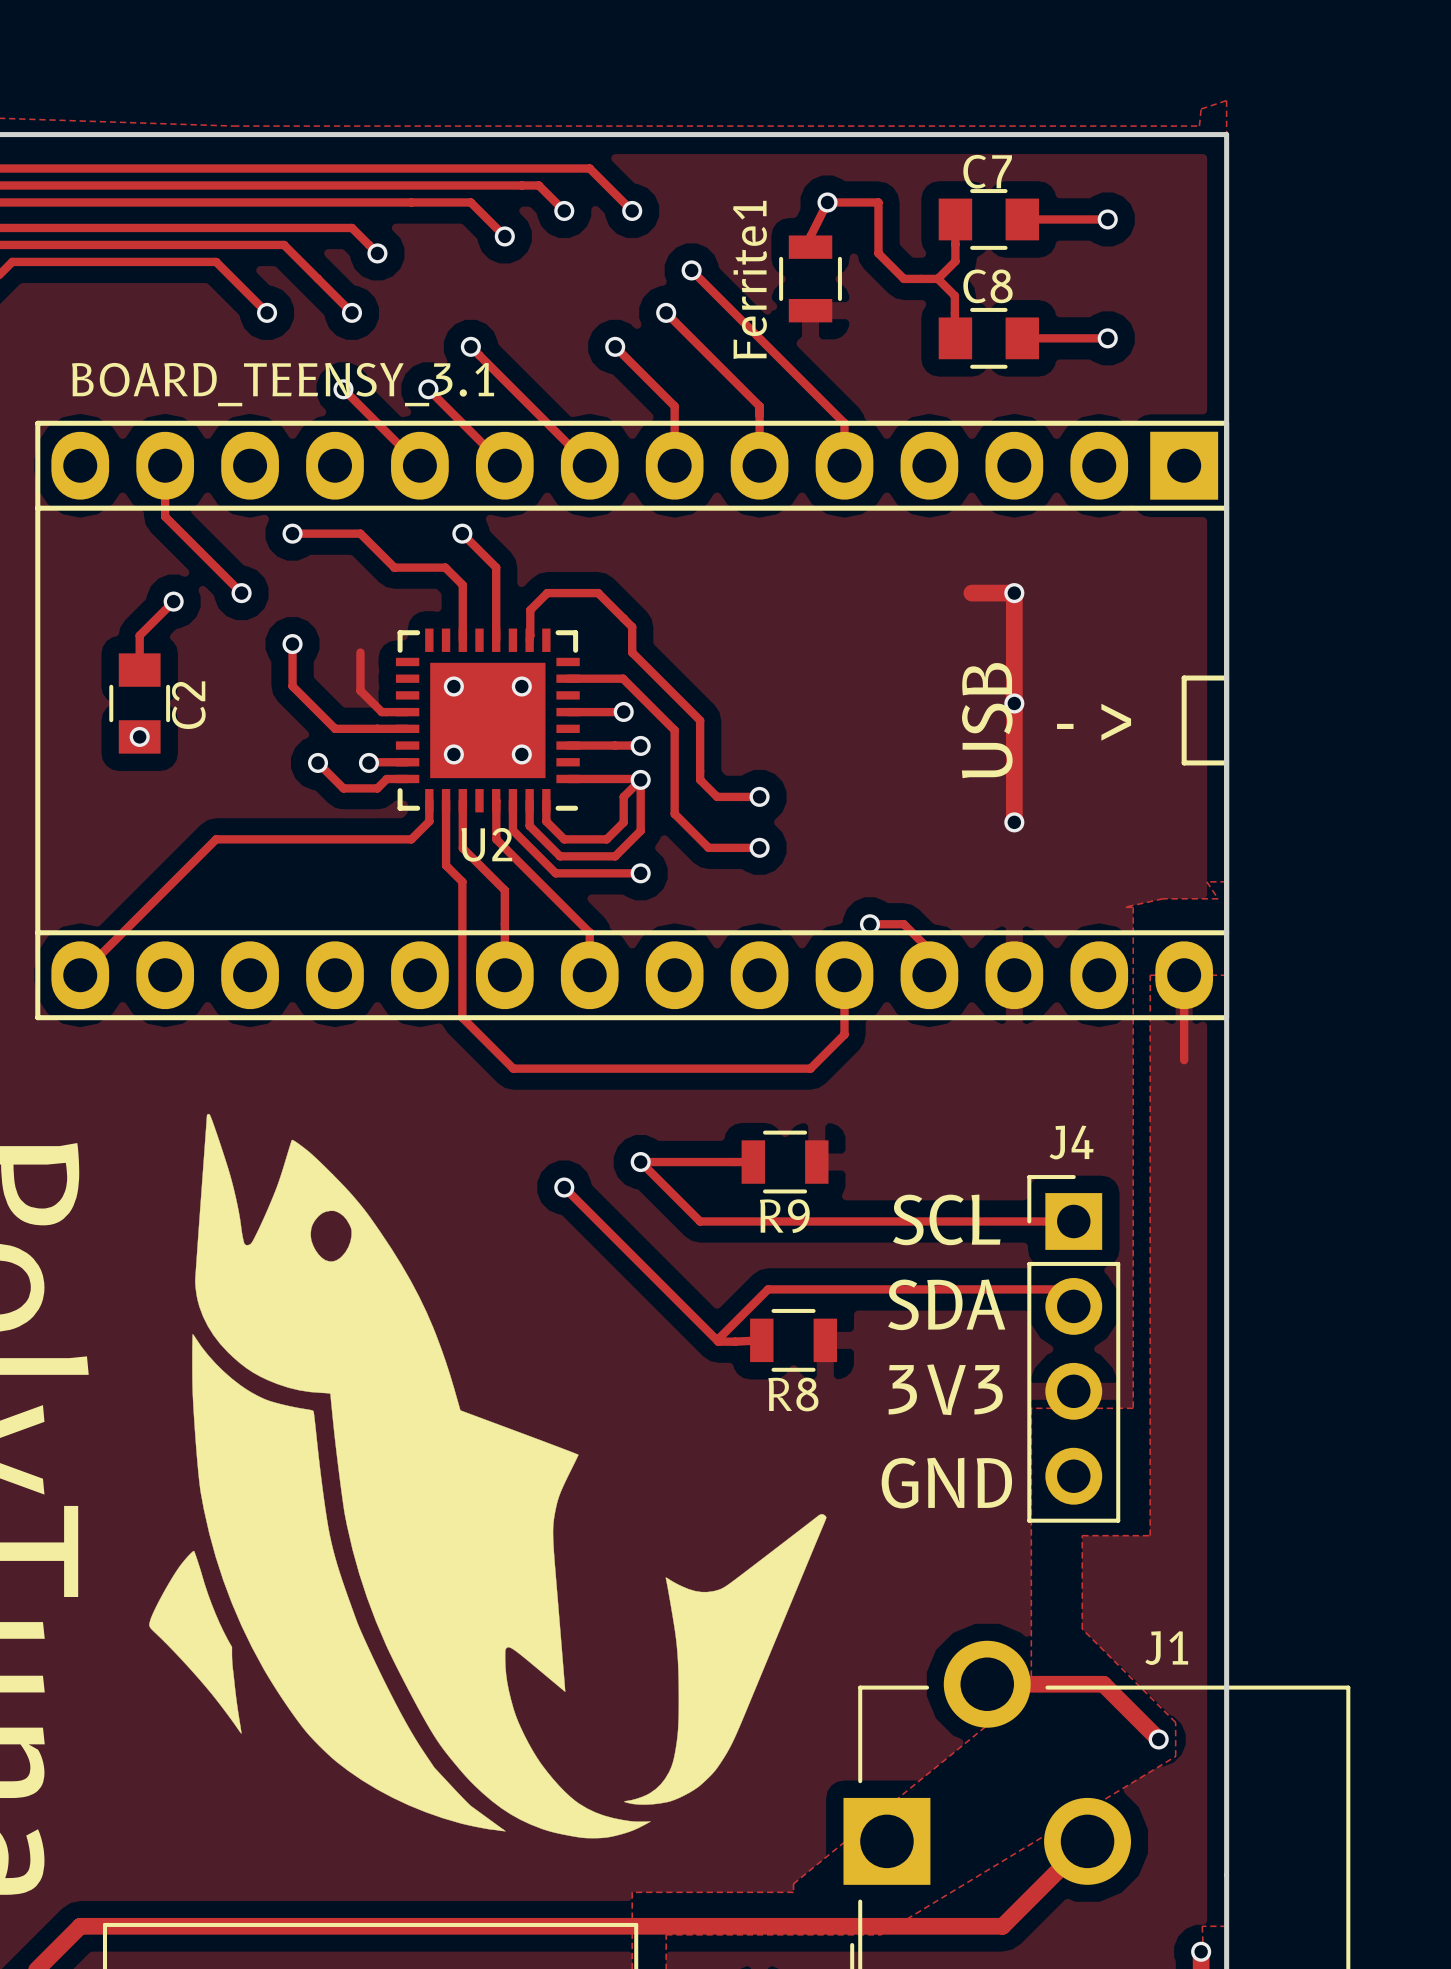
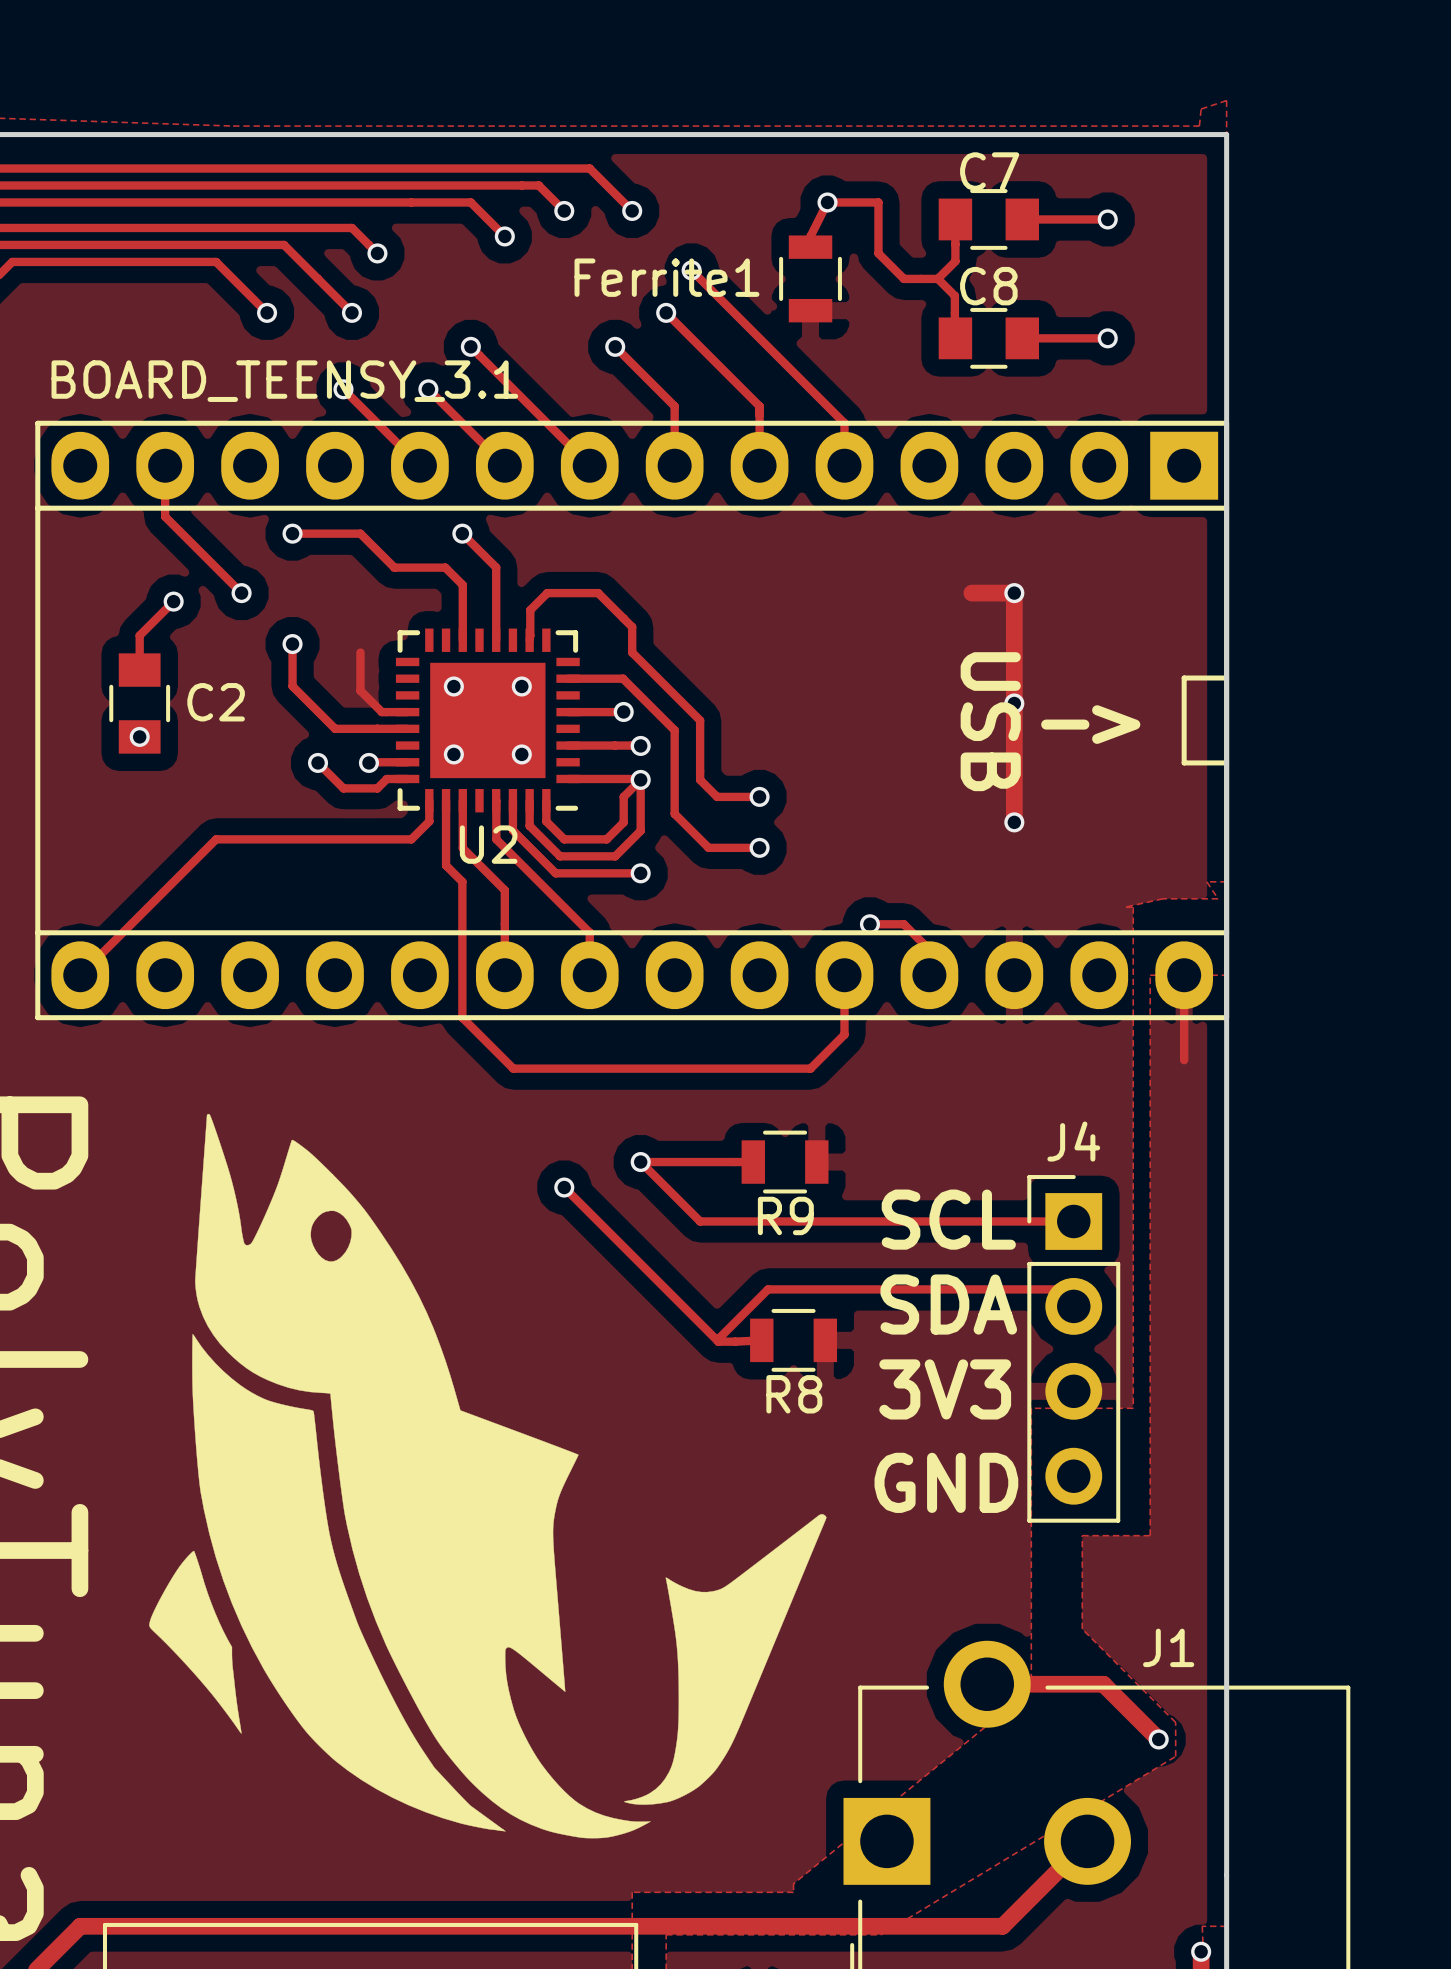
Ferrite1 name rotation: 0° (750, 279) -> 90° clockwise (666, 277)
C2 name rotation: 0° (188, 705) -> 90° clockwise (216, 702)
text rotation: 0° (987, 720) -> 180° (990, 721)

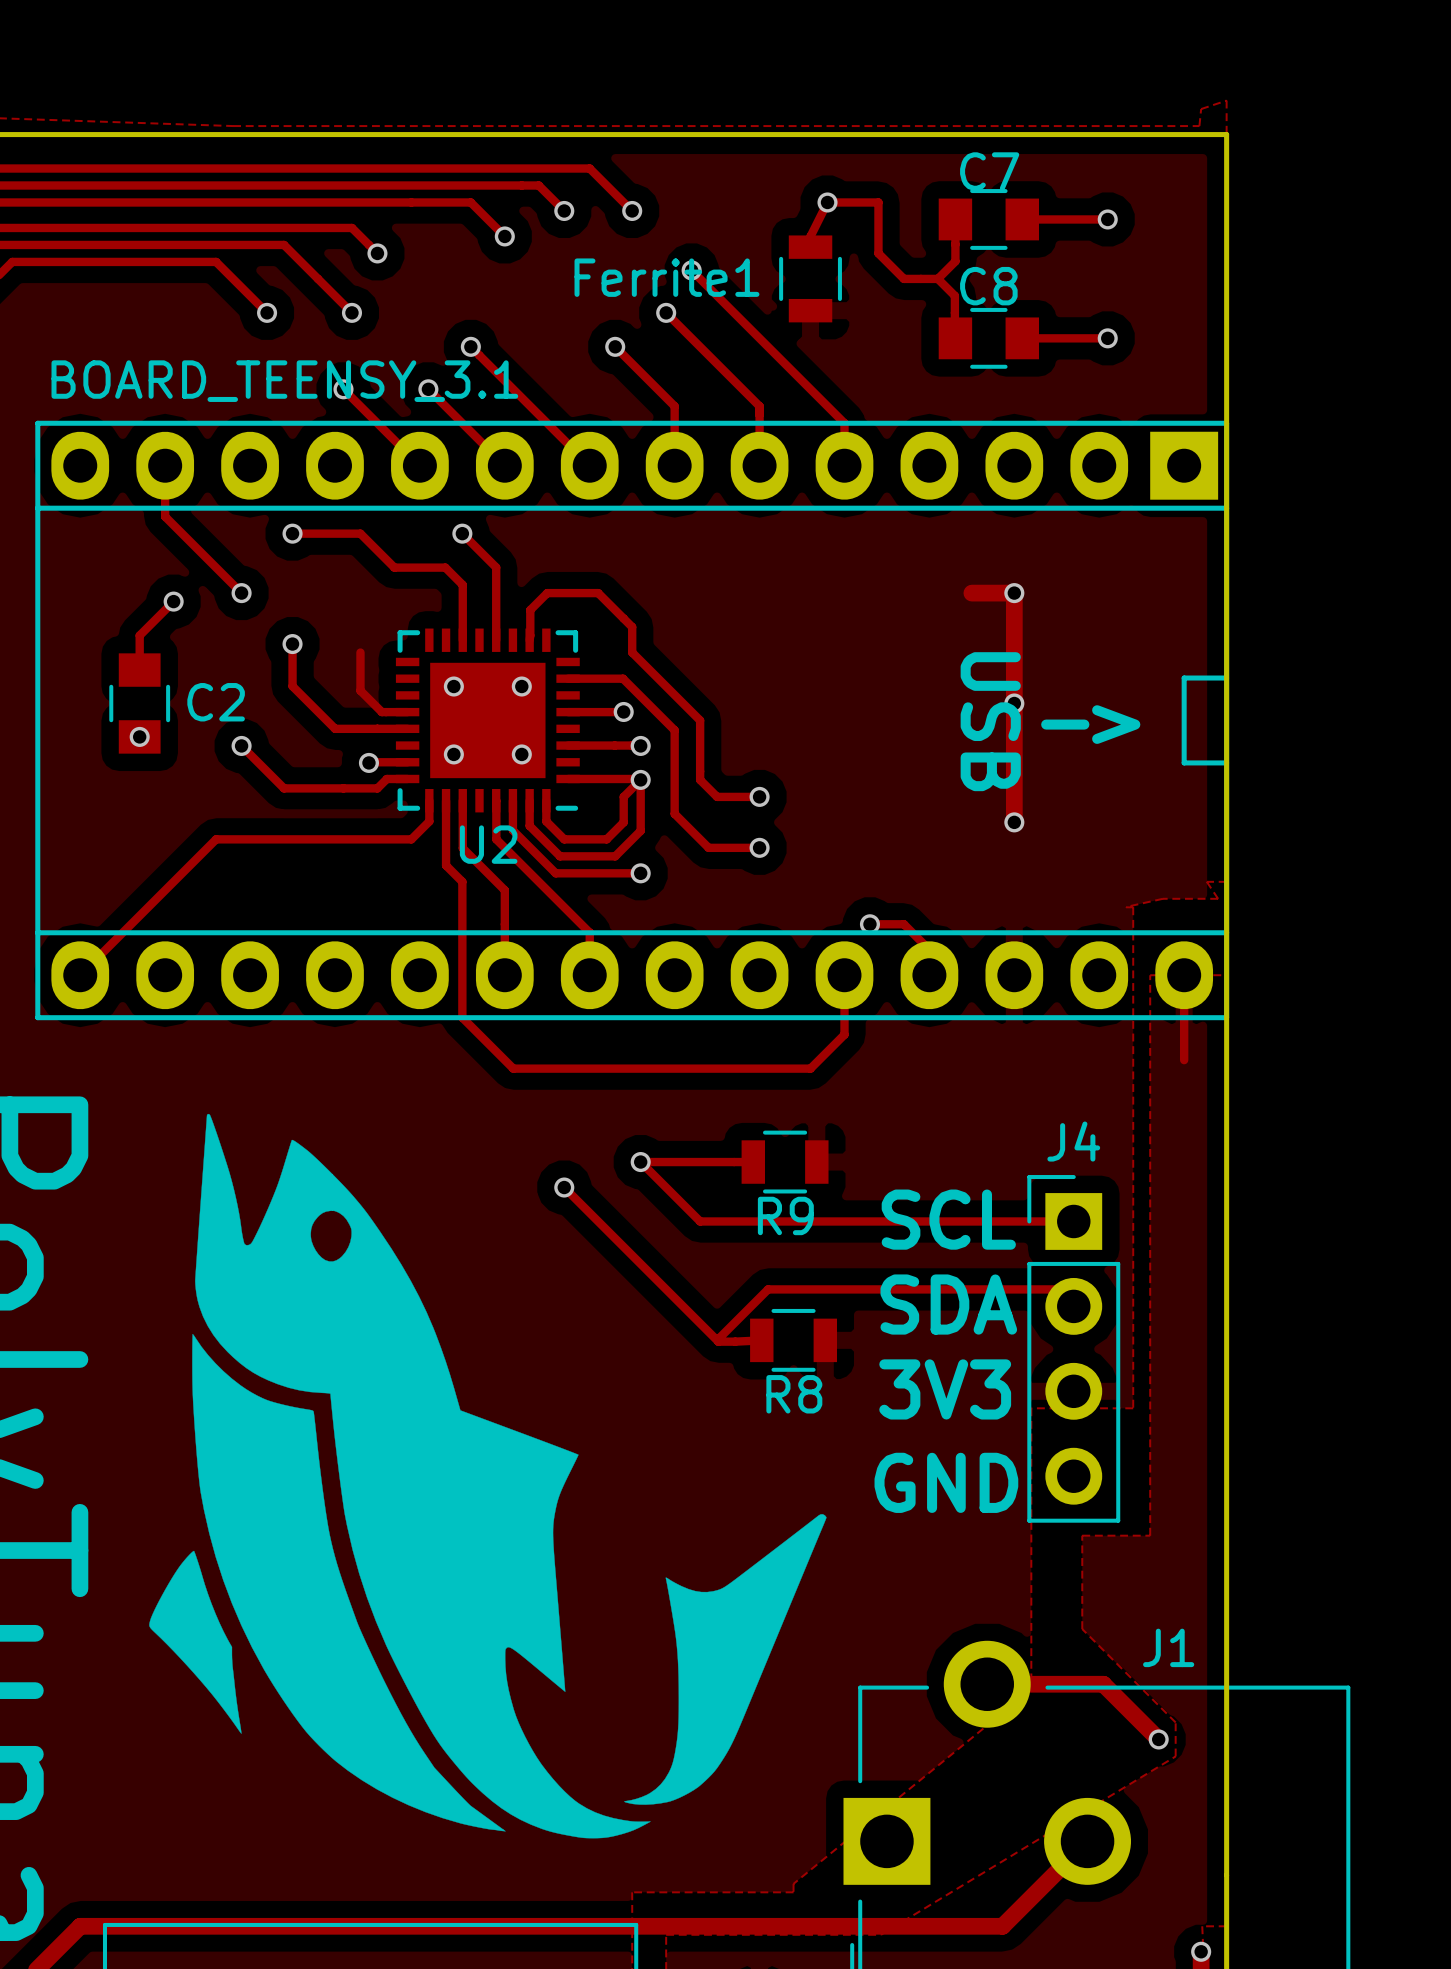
track: (318, 762) (343, 788) -> (241, 745) (284, 788) (343, 788)
via position: (318, 762) -> (241, 745)

